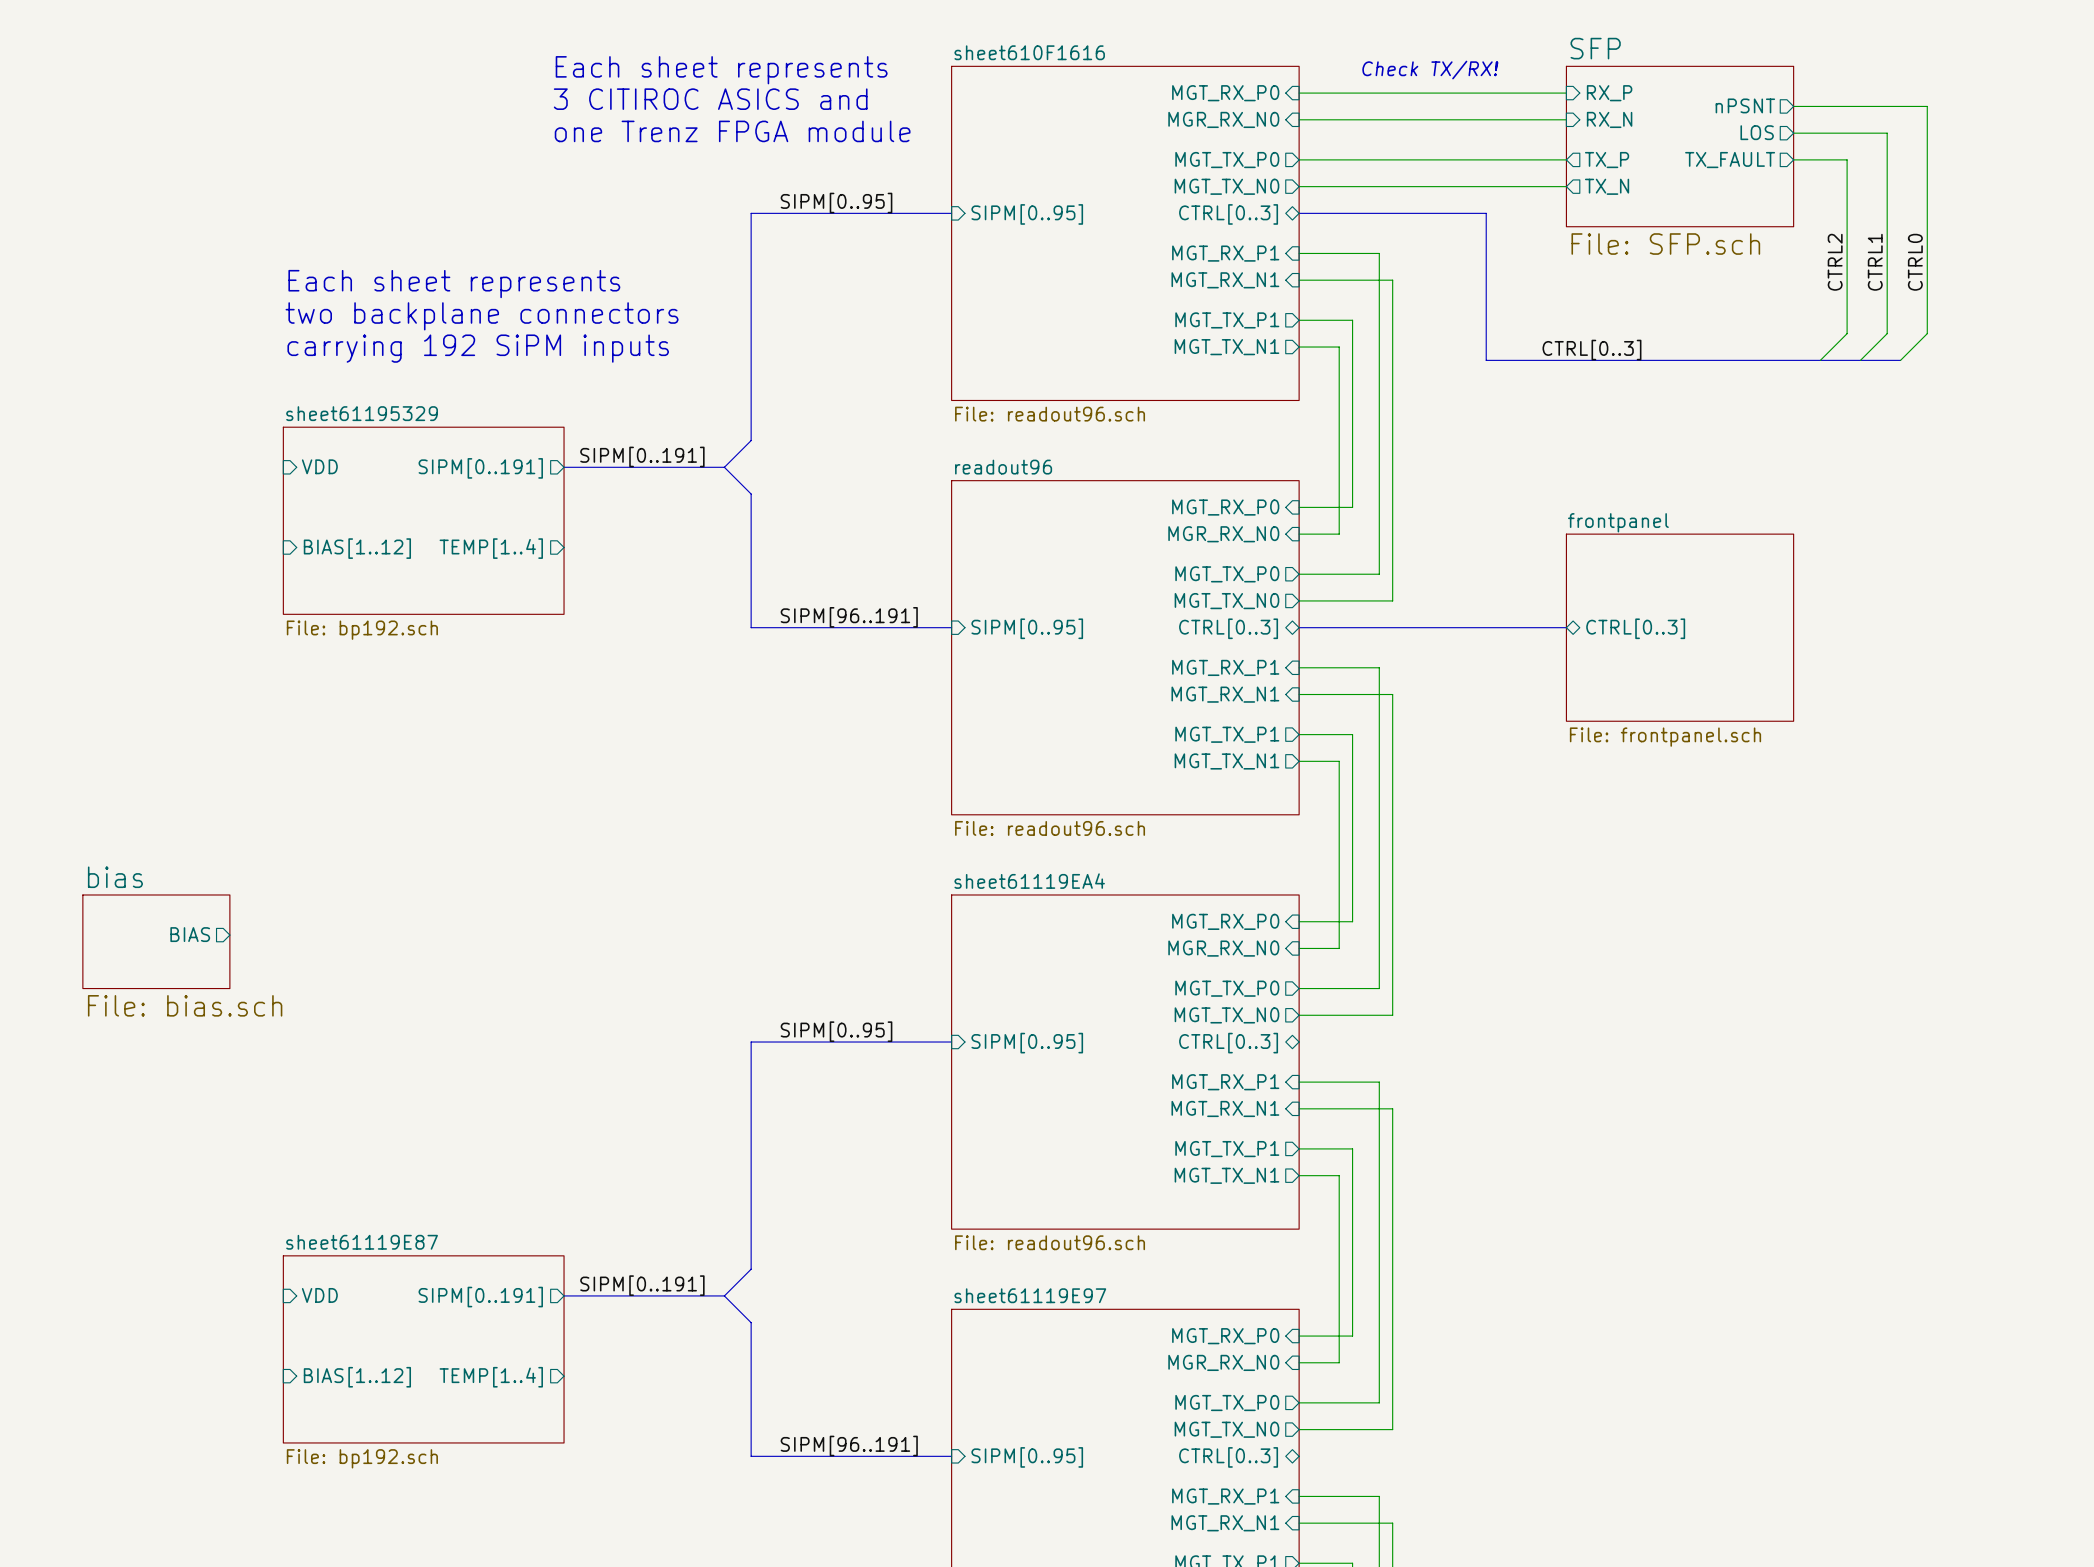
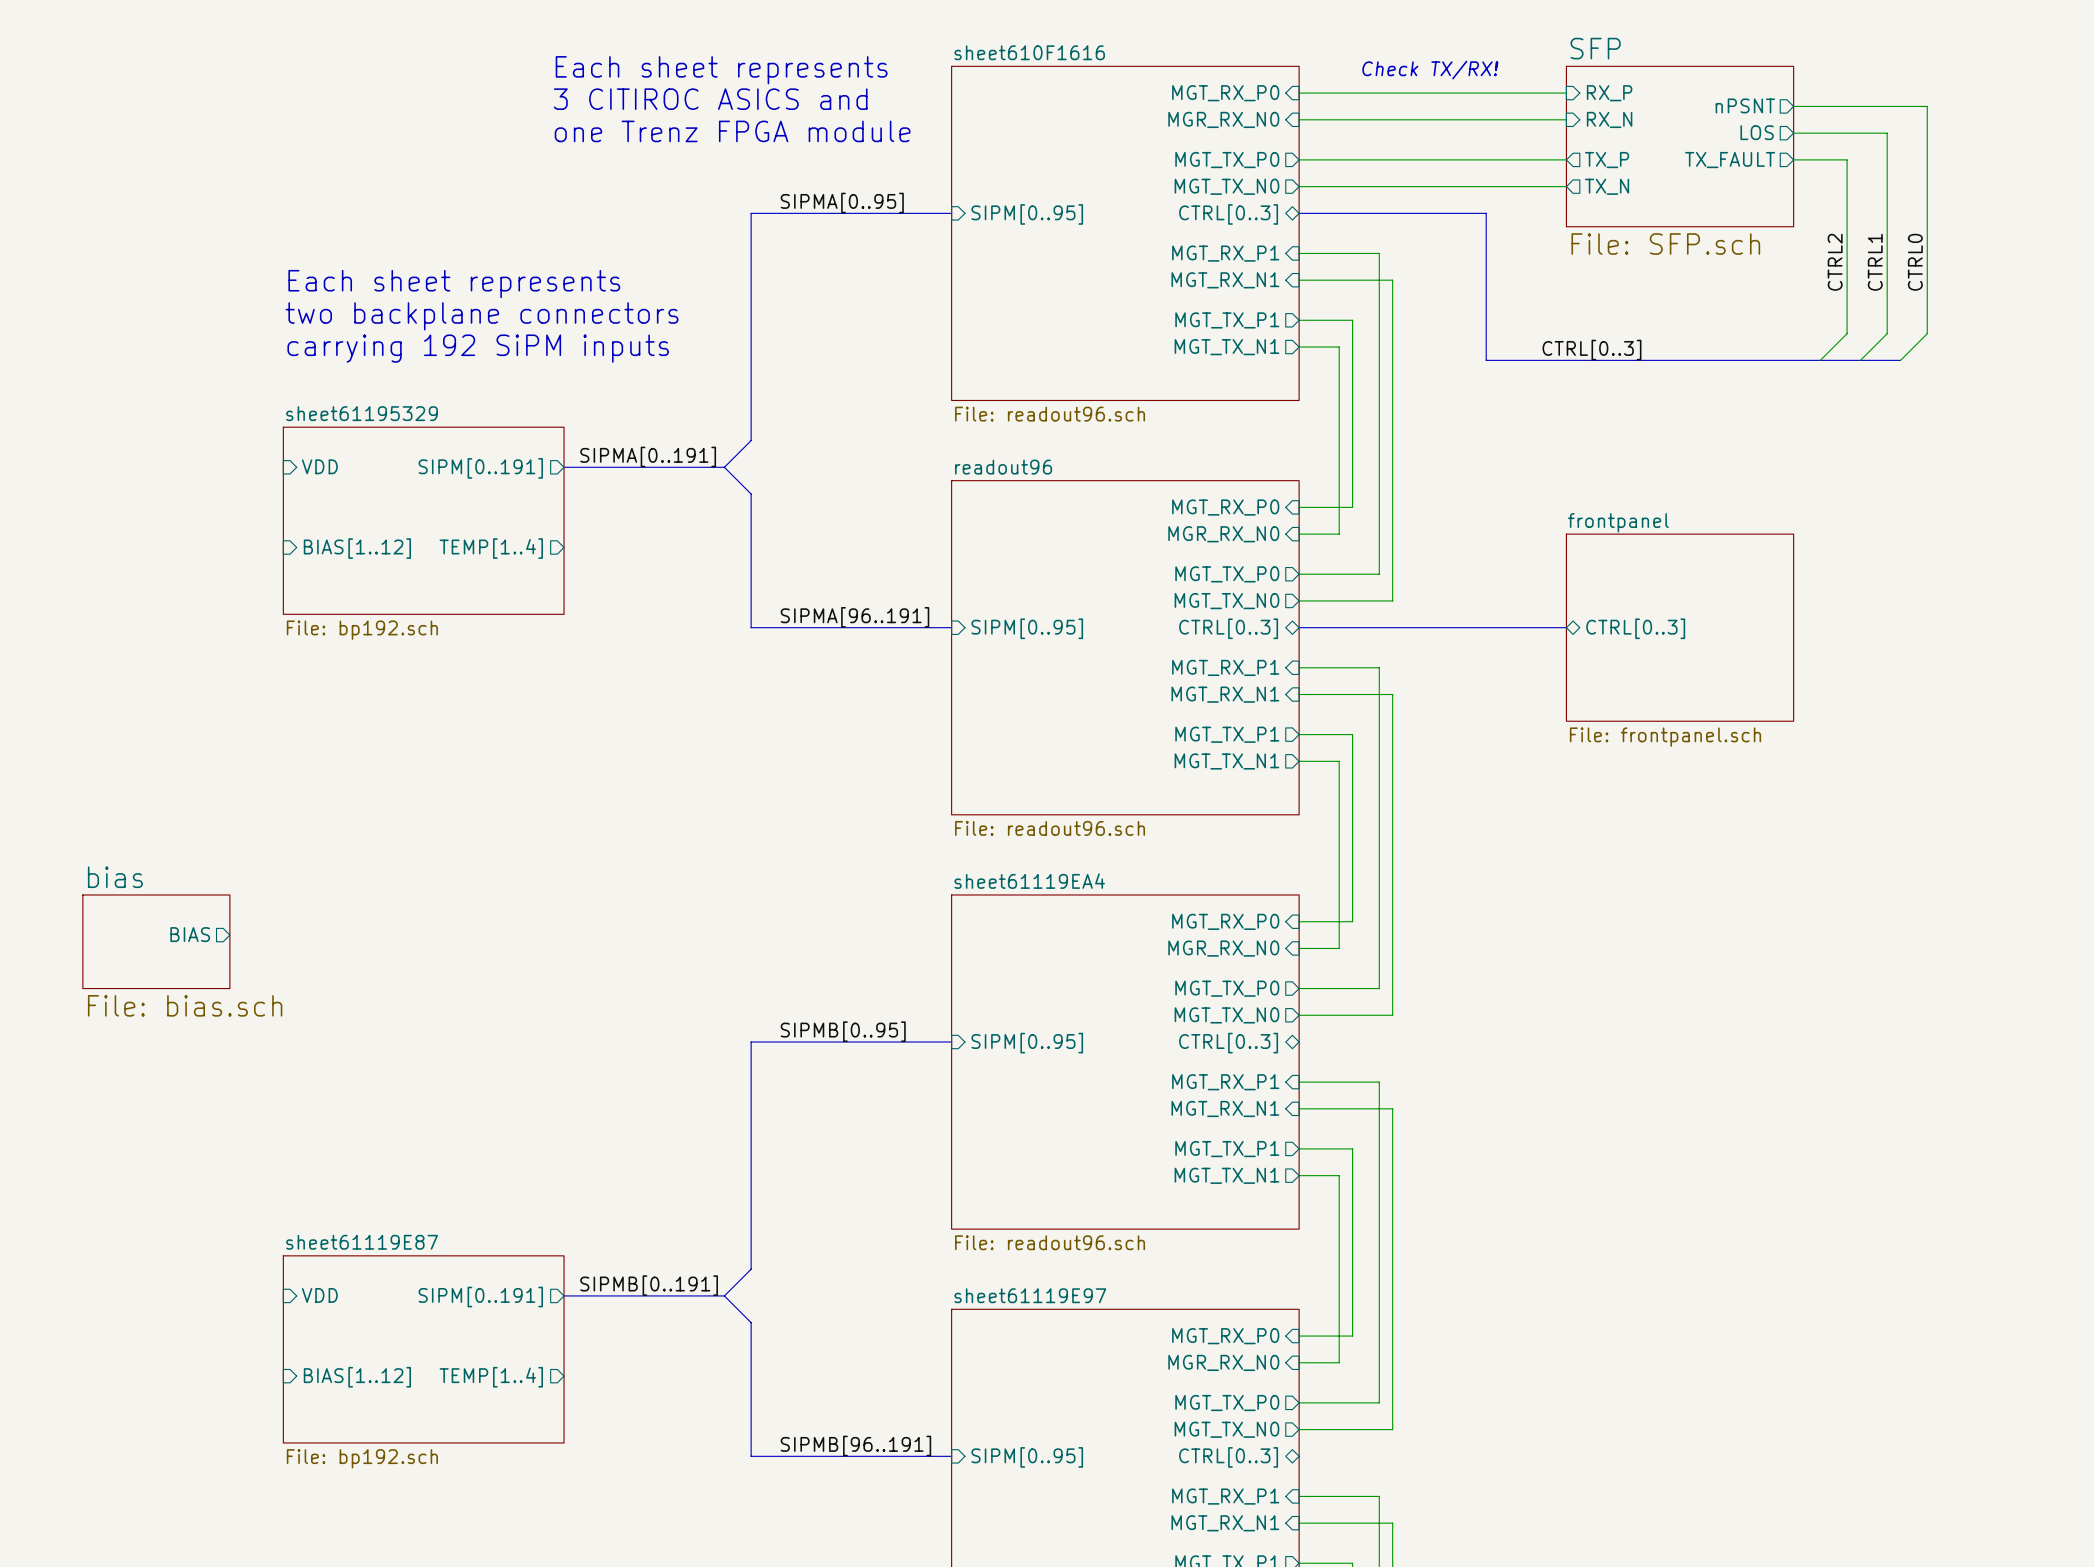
label: SIPM[0..95] (836, 203) -> SIPMA[0..95] (842, 203)
label: SIPM[0..191] (642, 456) -> SIPMA[0..191] (648, 456)
label: SIPM[96..191] (849, 617) -> SIPMA[96..191] (854, 617)
label: SIPM[0..95] (836, 1031) -> SIPMB[0..95] (843, 1031)
label: SIPM[0..191] (642, 1285) -> SIPMB[0..191] (649, 1285)
label: SIPM[96..191] (849, 1446) -> SIPMB[96..191] (855, 1446)

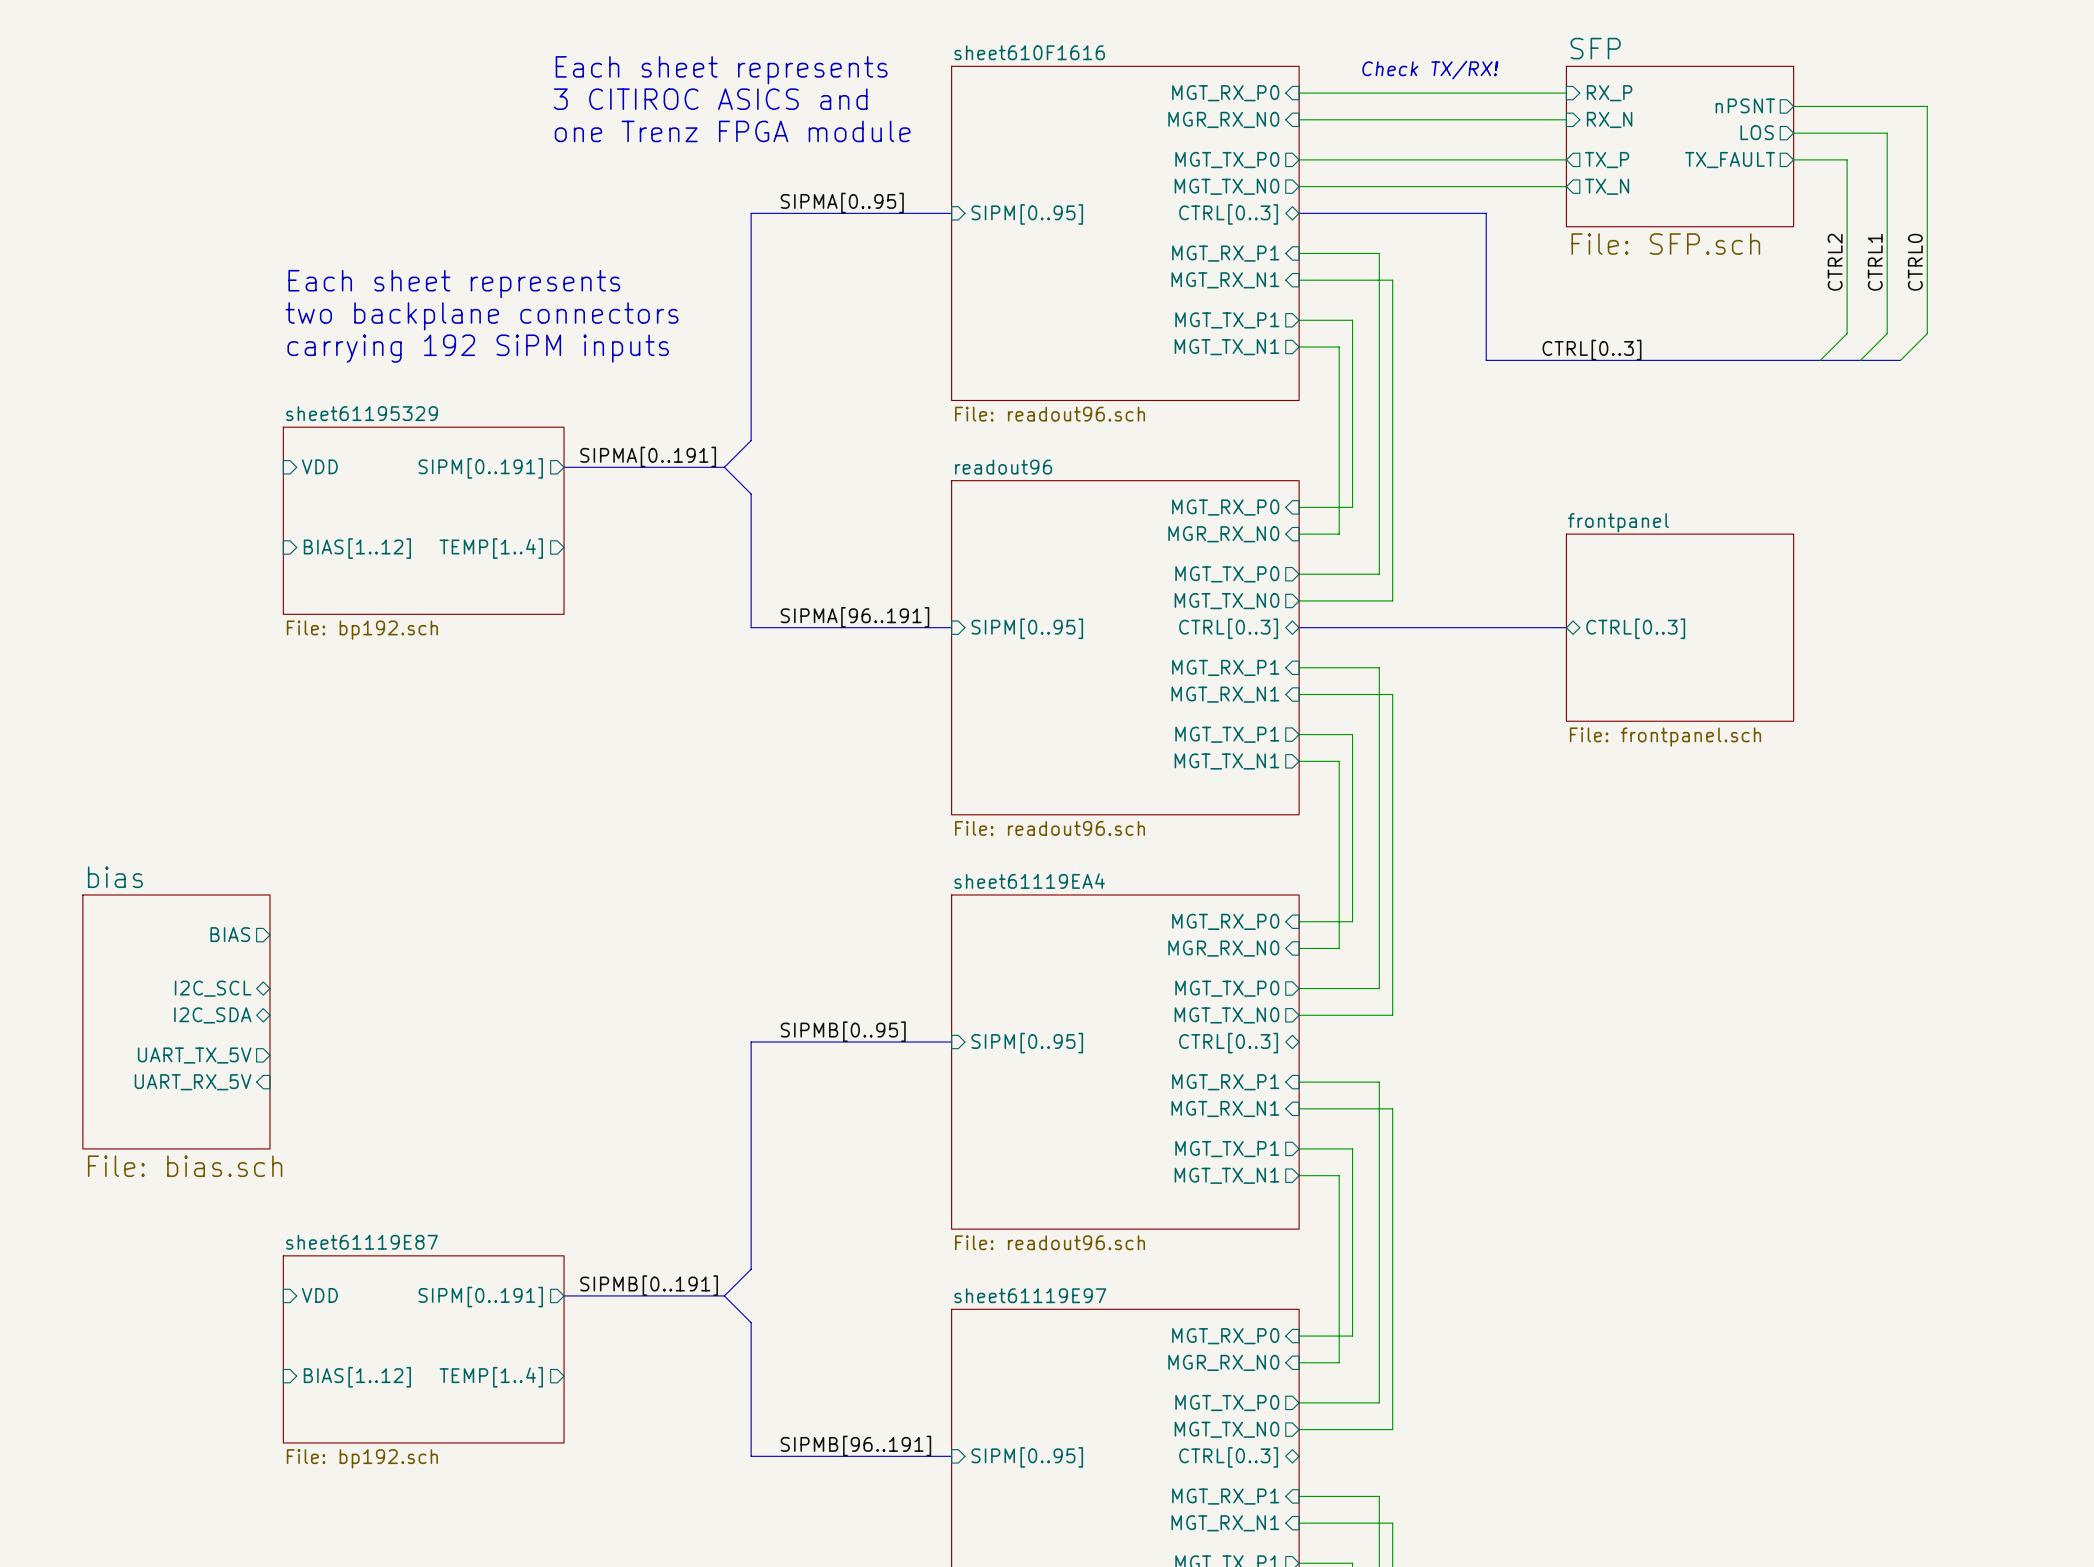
sheet pin position: BIAS (190, 934) -> BIAS (230, 934)
sheet bias: File: bias.sch (156, 941) -> none
sheet pin: none -> I2C_SCL (213, 988)
sheet pin: none -> I2C_SDA (212, 1015)
sheet bias: none -> File: bias.sch (176, 1021)
sheet pin: none -> UART_TX_5V (194, 1055)
sheet pin: none -> UART_RX_5V (193, 1082)

